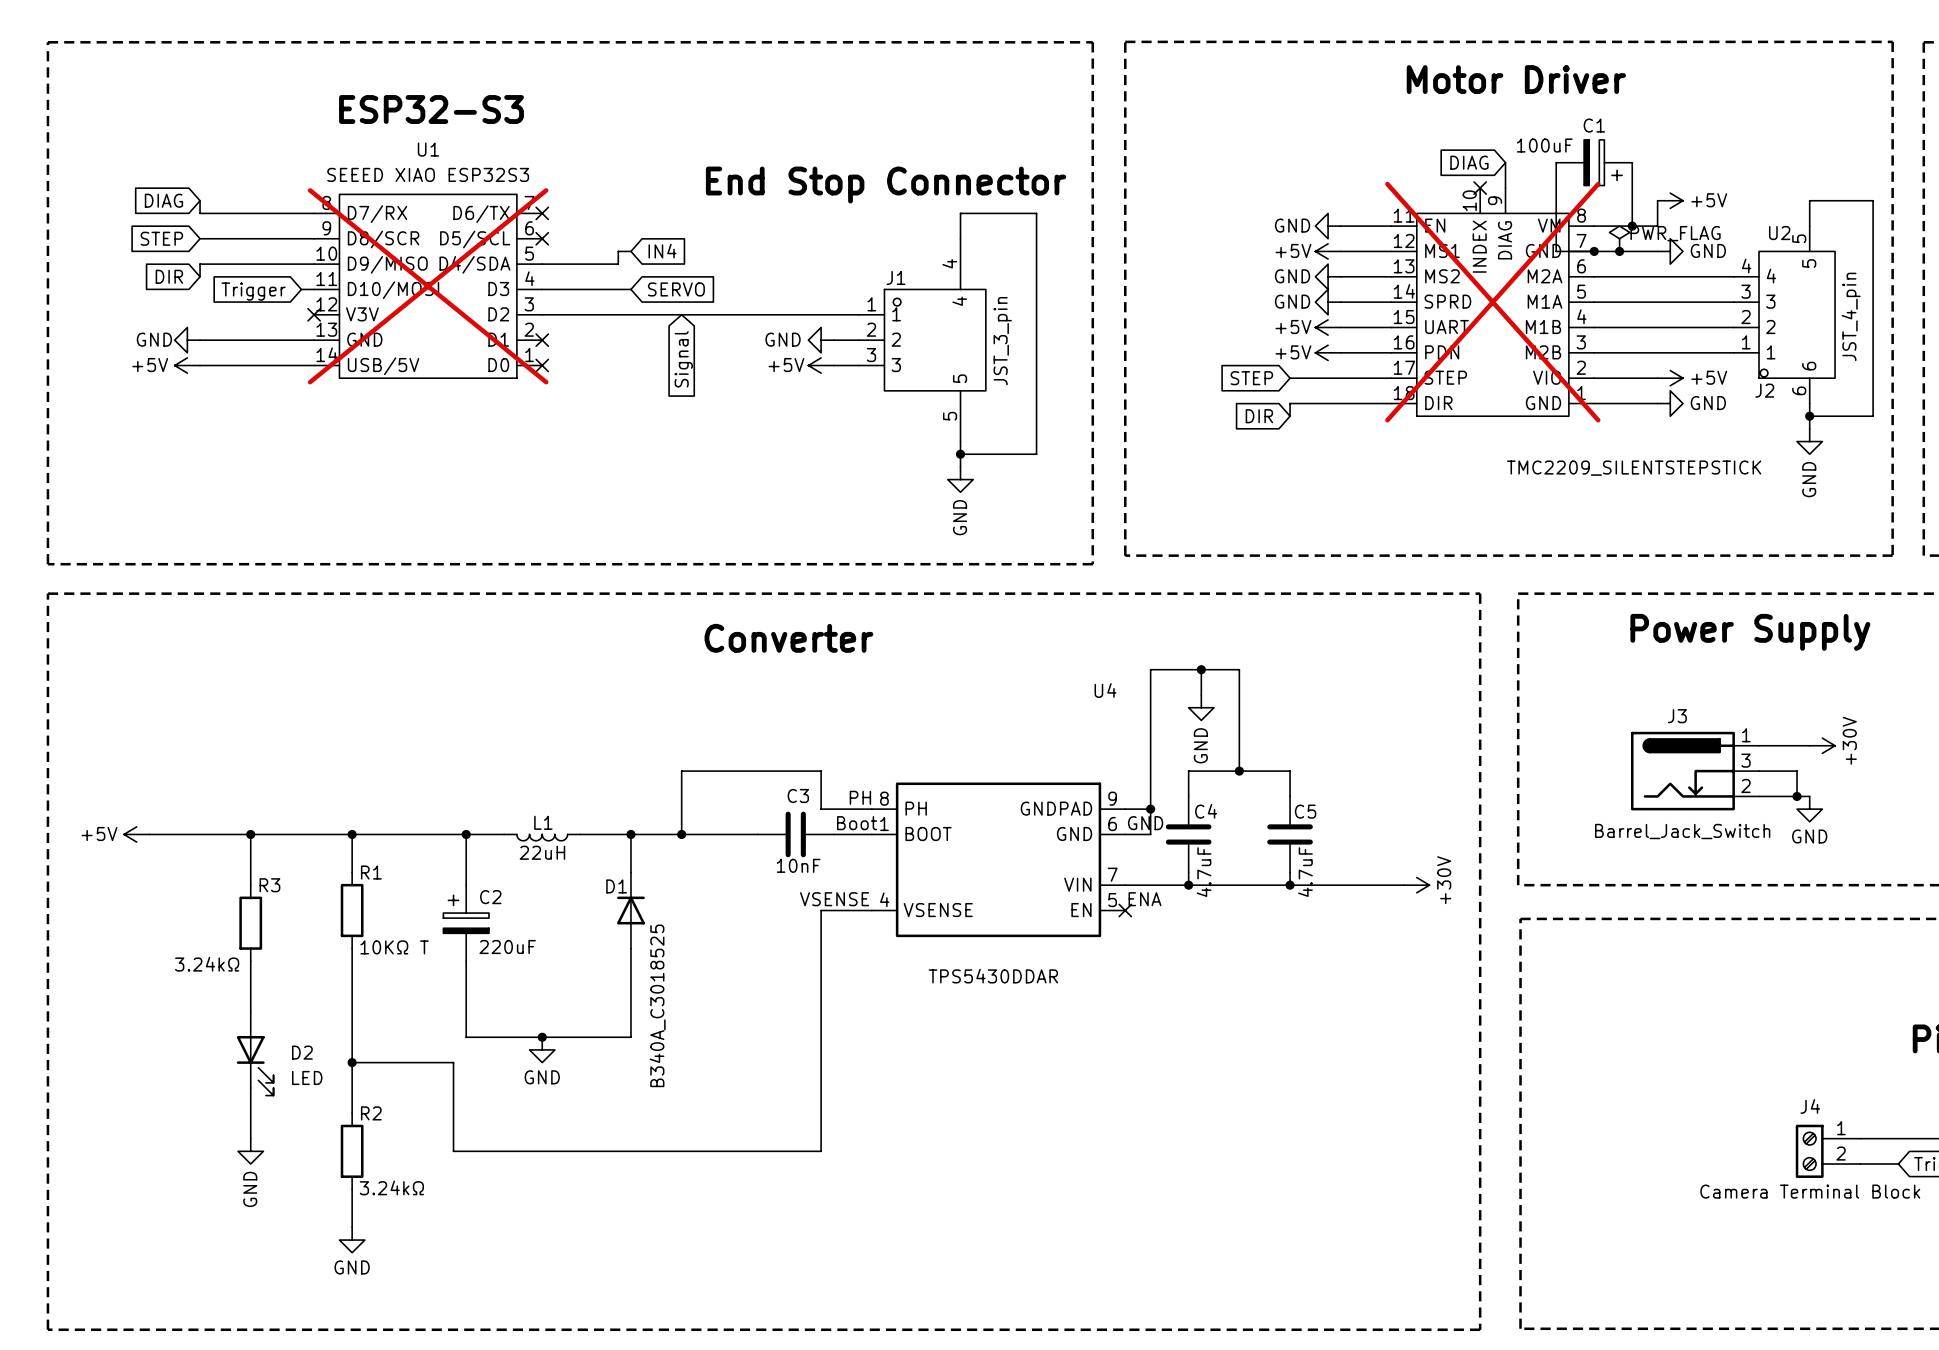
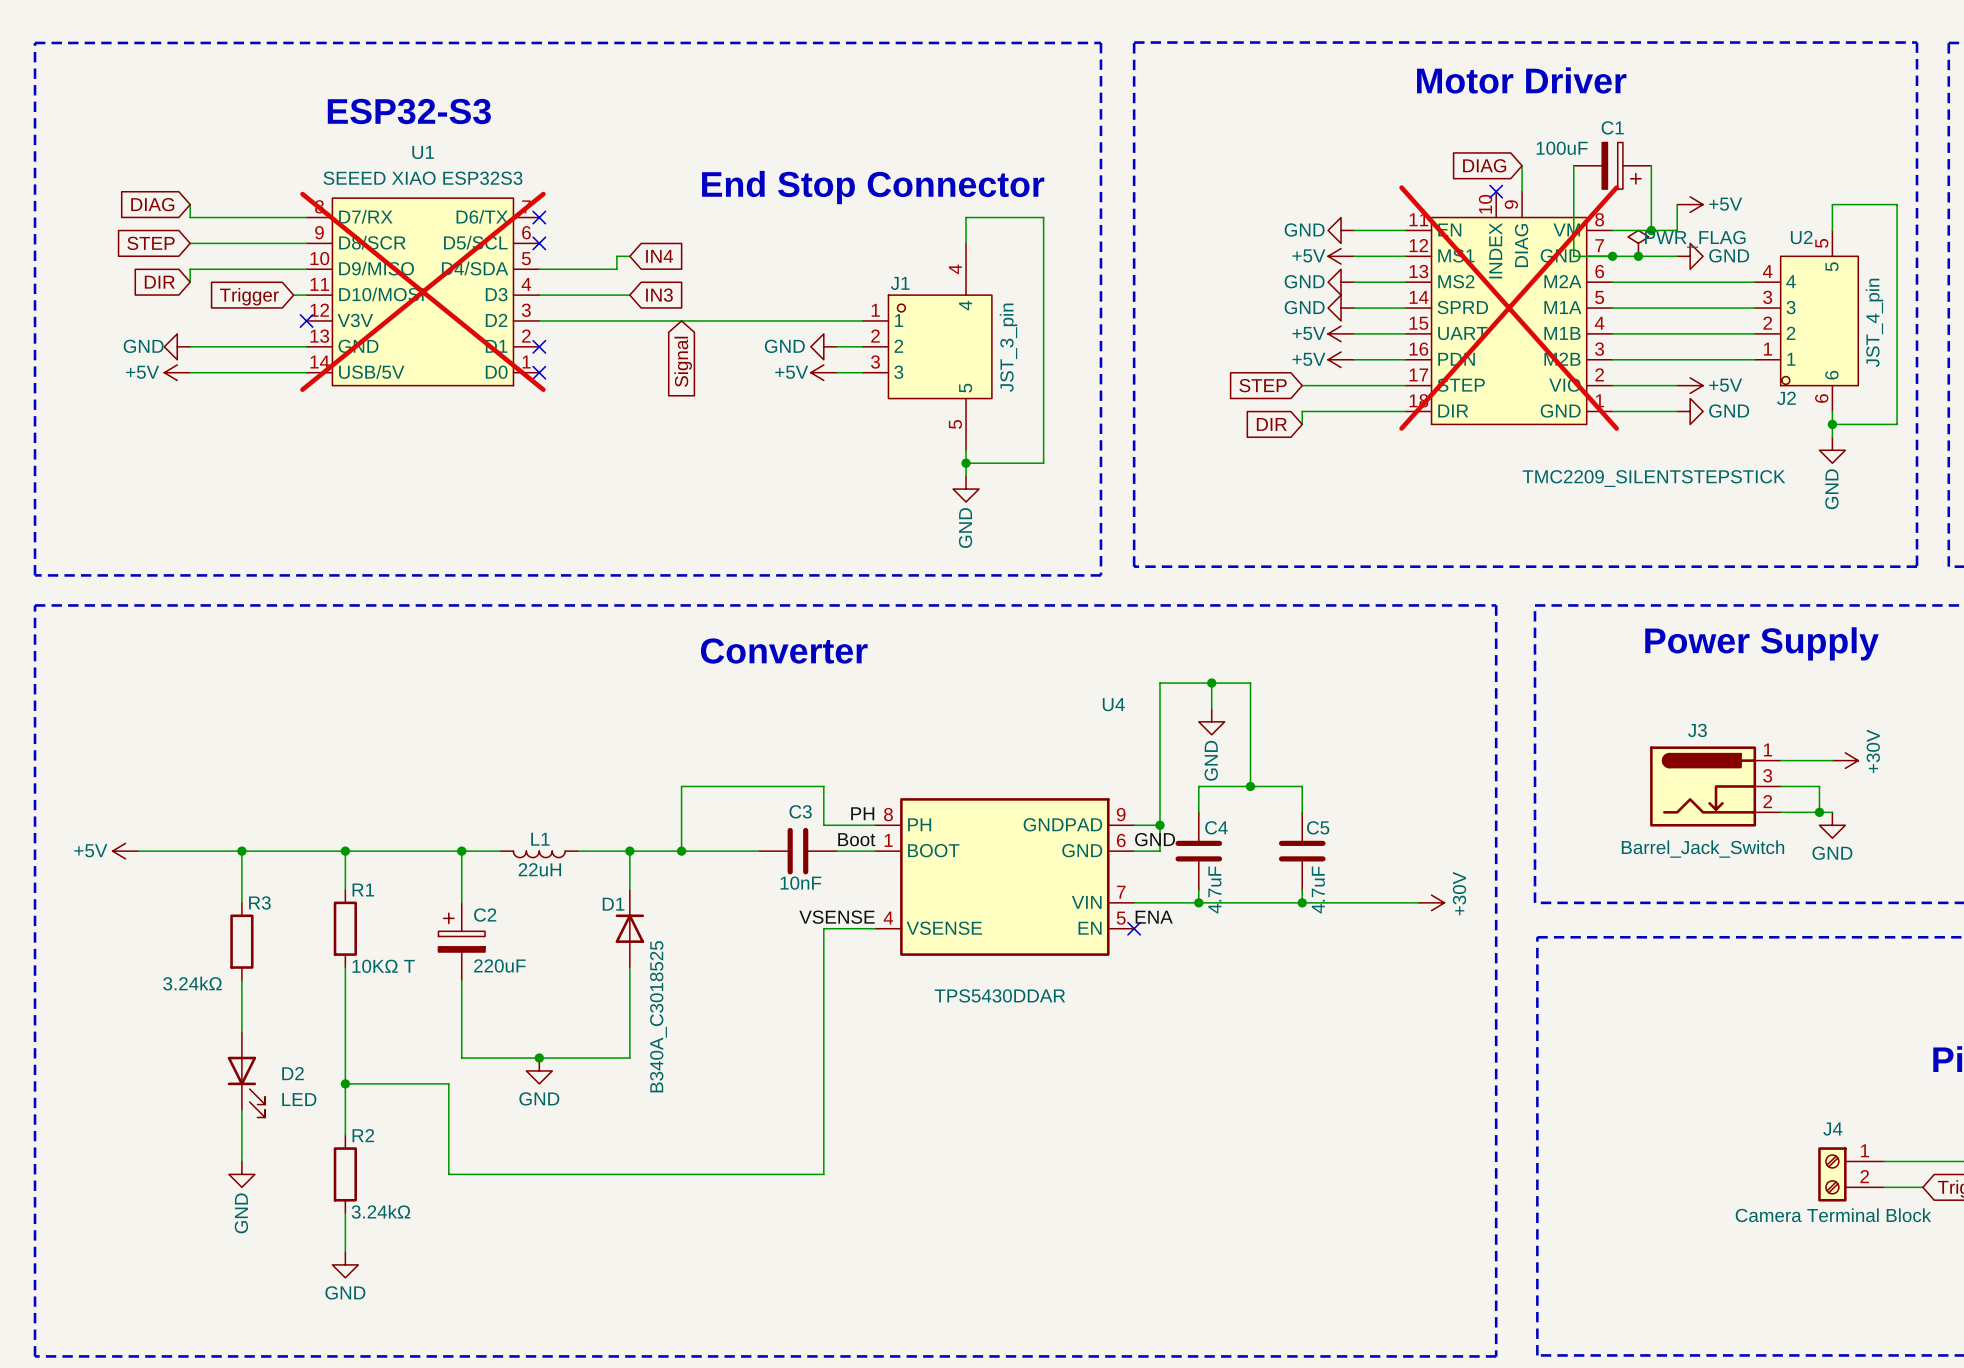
global label: SERVO (676, 289) -> IN3 (659, 295)

